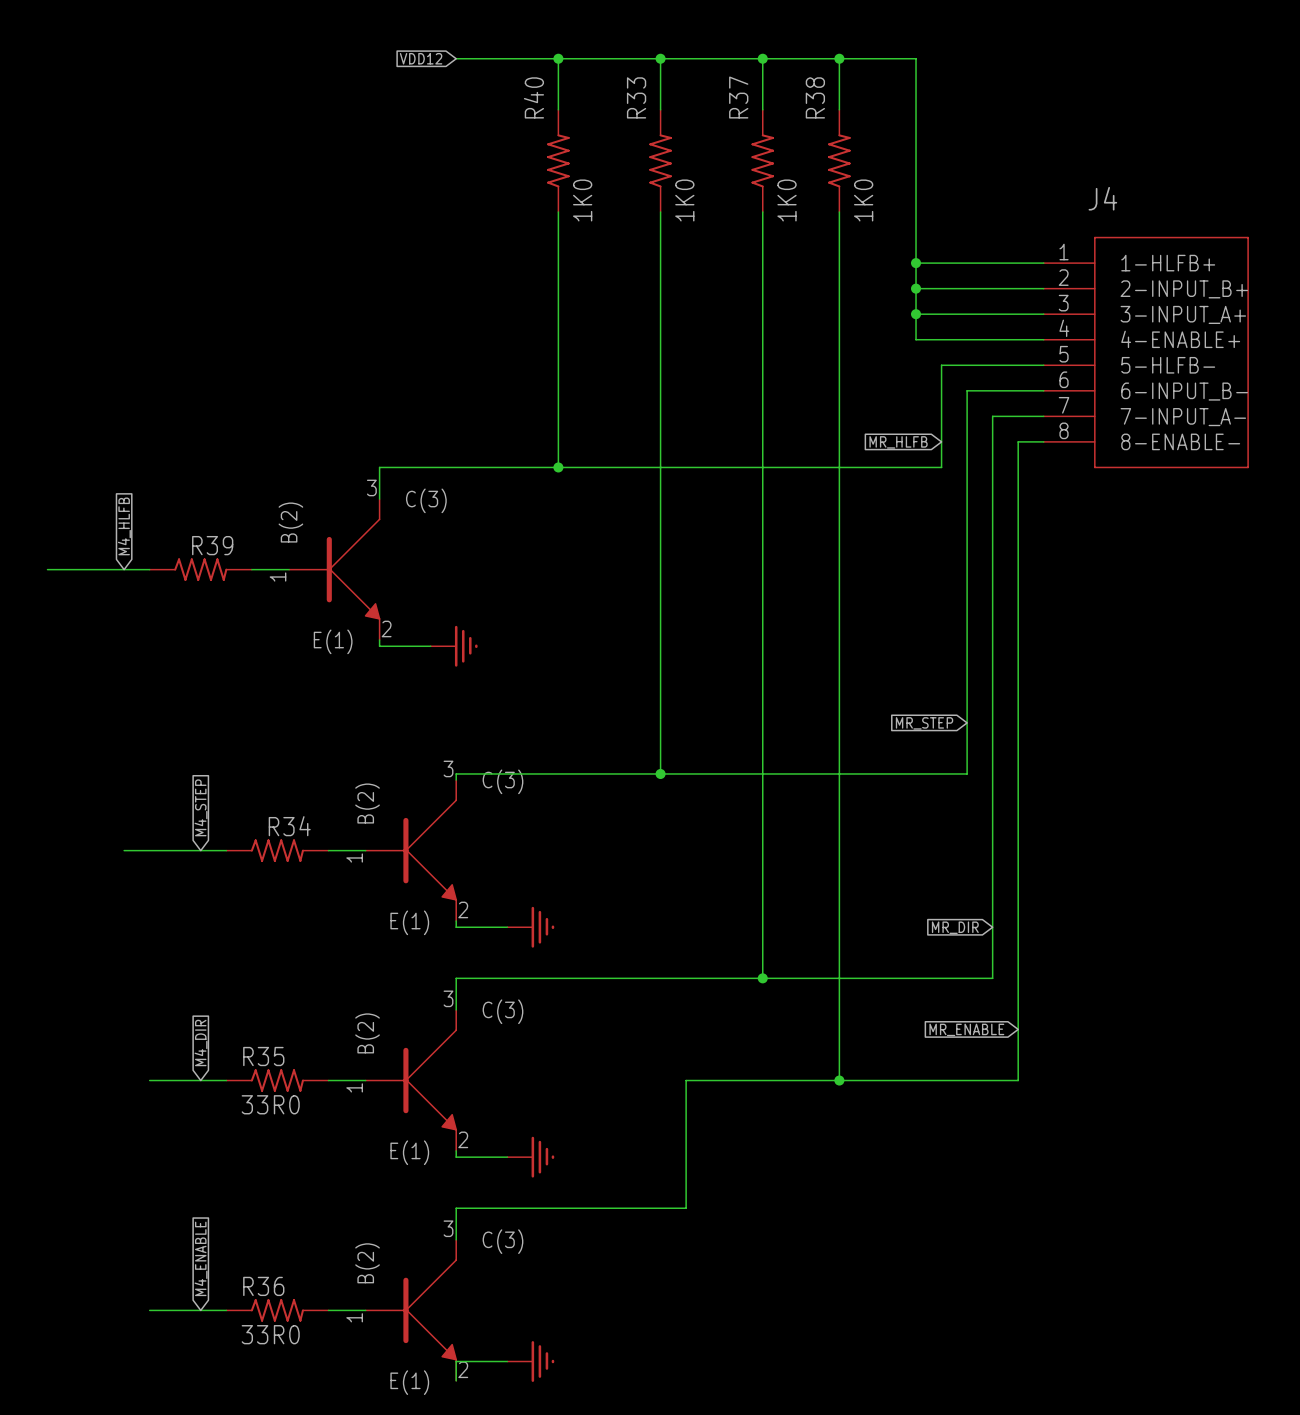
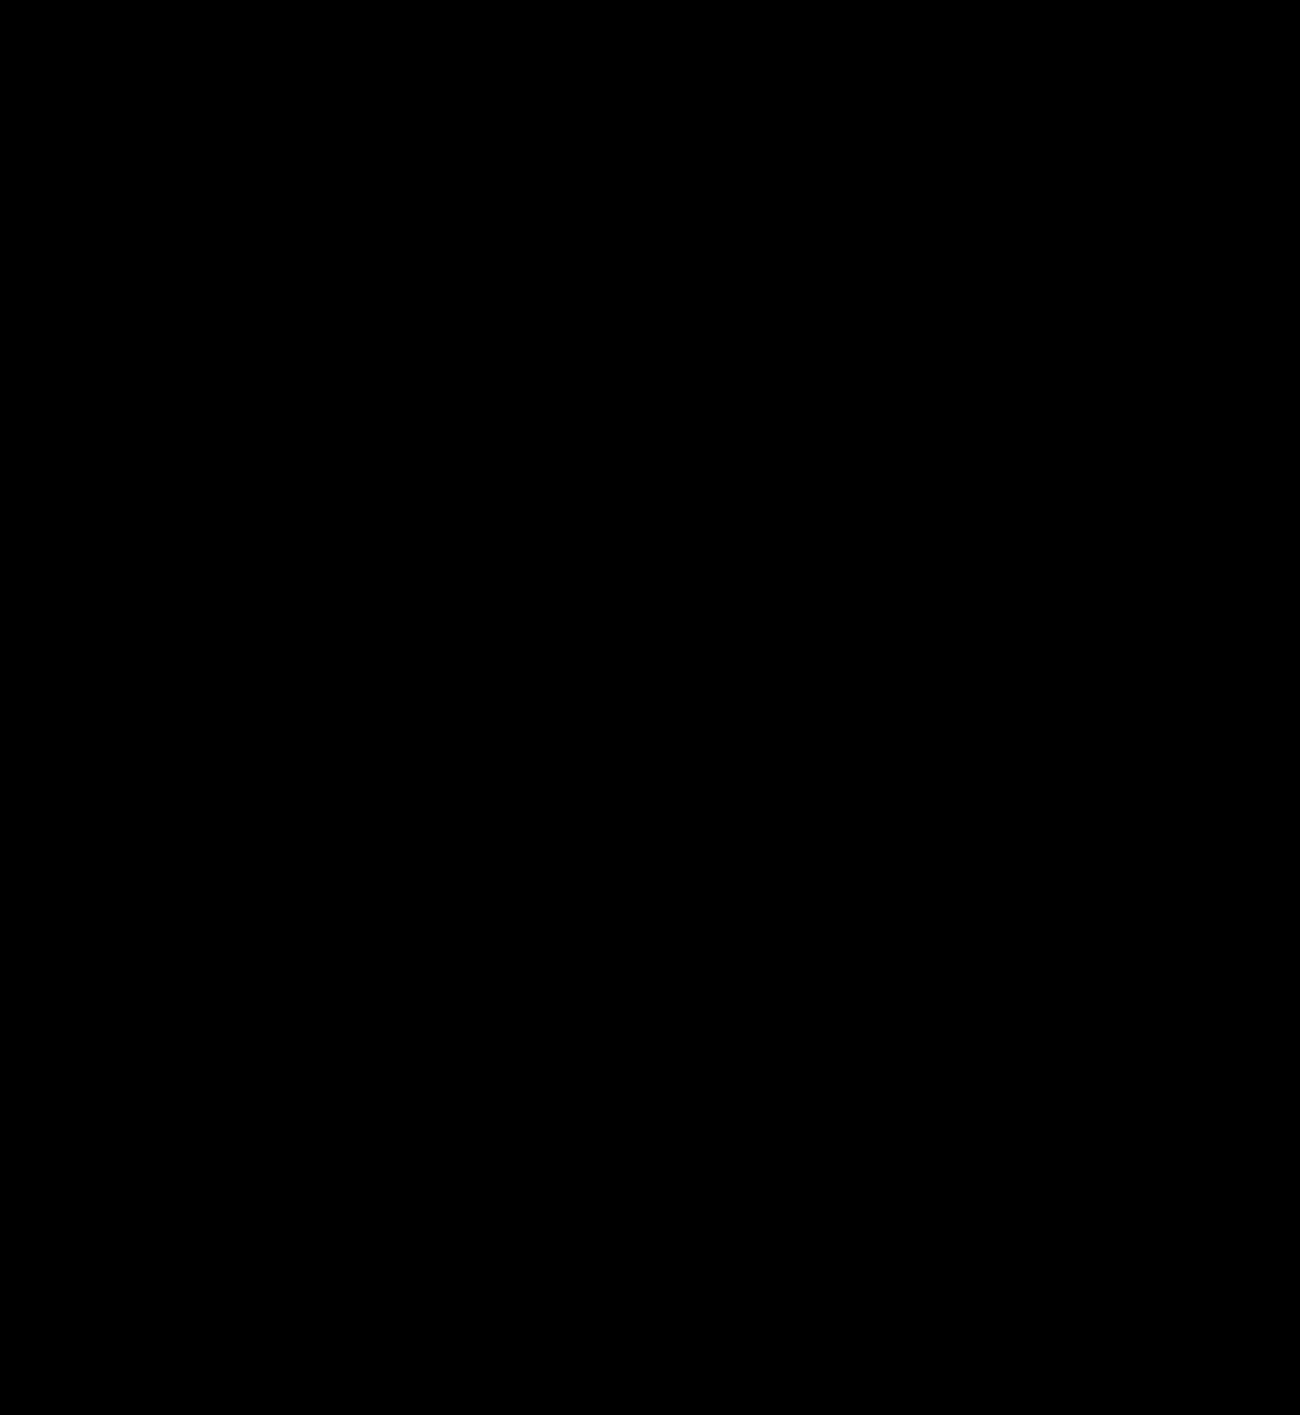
global label: VDD12 (421, 58) -> none
wire: (456, 58) (916, 58) (916, 339) (1043, 339) -> none
wire: (558, 58) (558, 109) -> none
junction: (558, 58) -> none
wire: (660, 58) (660, 109) -> none
junction: (660, 58) -> none
wire: (762, 58) (762, 109) -> none
junction: (762, 58) -> none
wire: (839, 58) (839, 109) -> none
junction: (839, 58) -> none
R40: 1K0 (558, 160) -> none
R33: 1K0 (660, 160) -> none
R37: 1K0 (762, 160) -> none
R38: 1K0 (839, 160) -> none
wire: (558, 212) (558, 467) -> none
wire: (660, 212) (660, 773) -> none
wire: (762, 212) (762, 978) -> none
wire: (839, 212) (839, 1080) -> none
wire: (916, 263) (1043, 263) -> none
junction: (916, 263) -> none
wire: (916, 288) (1043, 288) -> none
junction: (916, 288) -> none
wire: (916, 314) (1043, 314) -> none
junction: (916, 314) -> none
J4: (1146, 352) -> none
wire: (1043, 365) (941, 365) (941, 467) (379, 467) (379, 499) -> none
wire: (1043, 390) (967, 390) (967, 773) (456, 773) (456, 780) -> none
wire: (1043, 416) (992, 416) (992, 978) (456, 978) (456, 1009) -> none
wire: (1043, 441) (1018, 441) (1018, 1080) (686, 1080) (686, 1208) (456, 1208) (456, 1239) -> none
global label: MR_HLFB (898, 442) -> none
junction: (558, 467) -> none
global label: M4_HLFB (124, 526) -> none
wire: (47, 569) (149, 569) -> none
R39: (200, 569) -> none
wire: (251, 569) (289, 569) -> none
part: (334, 569) -> none
wire: (379, 640) (379, 646) (430, 646) -> none
power symbol: (454, 646) -> none
global label: MR_STEP (924, 723) -> none
junction: (660, 773) -> none
global label: M4_STEP (201, 807) -> none
wire: (124, 850) (226, 850) -> none
R34: (277, 850) -> none
wire: (328, 850) (365, 850) -> none
part: (410, 850) -> none
wire: (456, 921) (456, 927) (507, 927) -> none
power symbol: (530, 927) -> none
global label: MR_DIR (955, 927) -> none
junction: (762, 978) -> none
global label: MR_ENABLE (966, 1029) -> none
global label: M4_DIR (201, 1042) -> none
wire: (149, 1080) (226, 1080) -> none
R35: 33R0 (277, 1080) -> none
wire: (328, 1080) (365, 1080) -> none
part: (410, 1080) -> none
junction: (839, 1080) -> none
wire: (456, 1150) (456, 1157) (507, 1157) -> none
power symbol: (530, 1157) -> none
global label: M4_ENABLE (201, 1258) -> none
wire: (149, 1310) (226, 1310) -> none
R36: 33R0 (277, 1310) -> none
wire: (328, 1310) (365, 1310) -> none
part: (410, 1310) -> none
wire: (507, 1361) (456, 1361) (456, 1380) -> none
power symbol: (530, 1361) -> none

